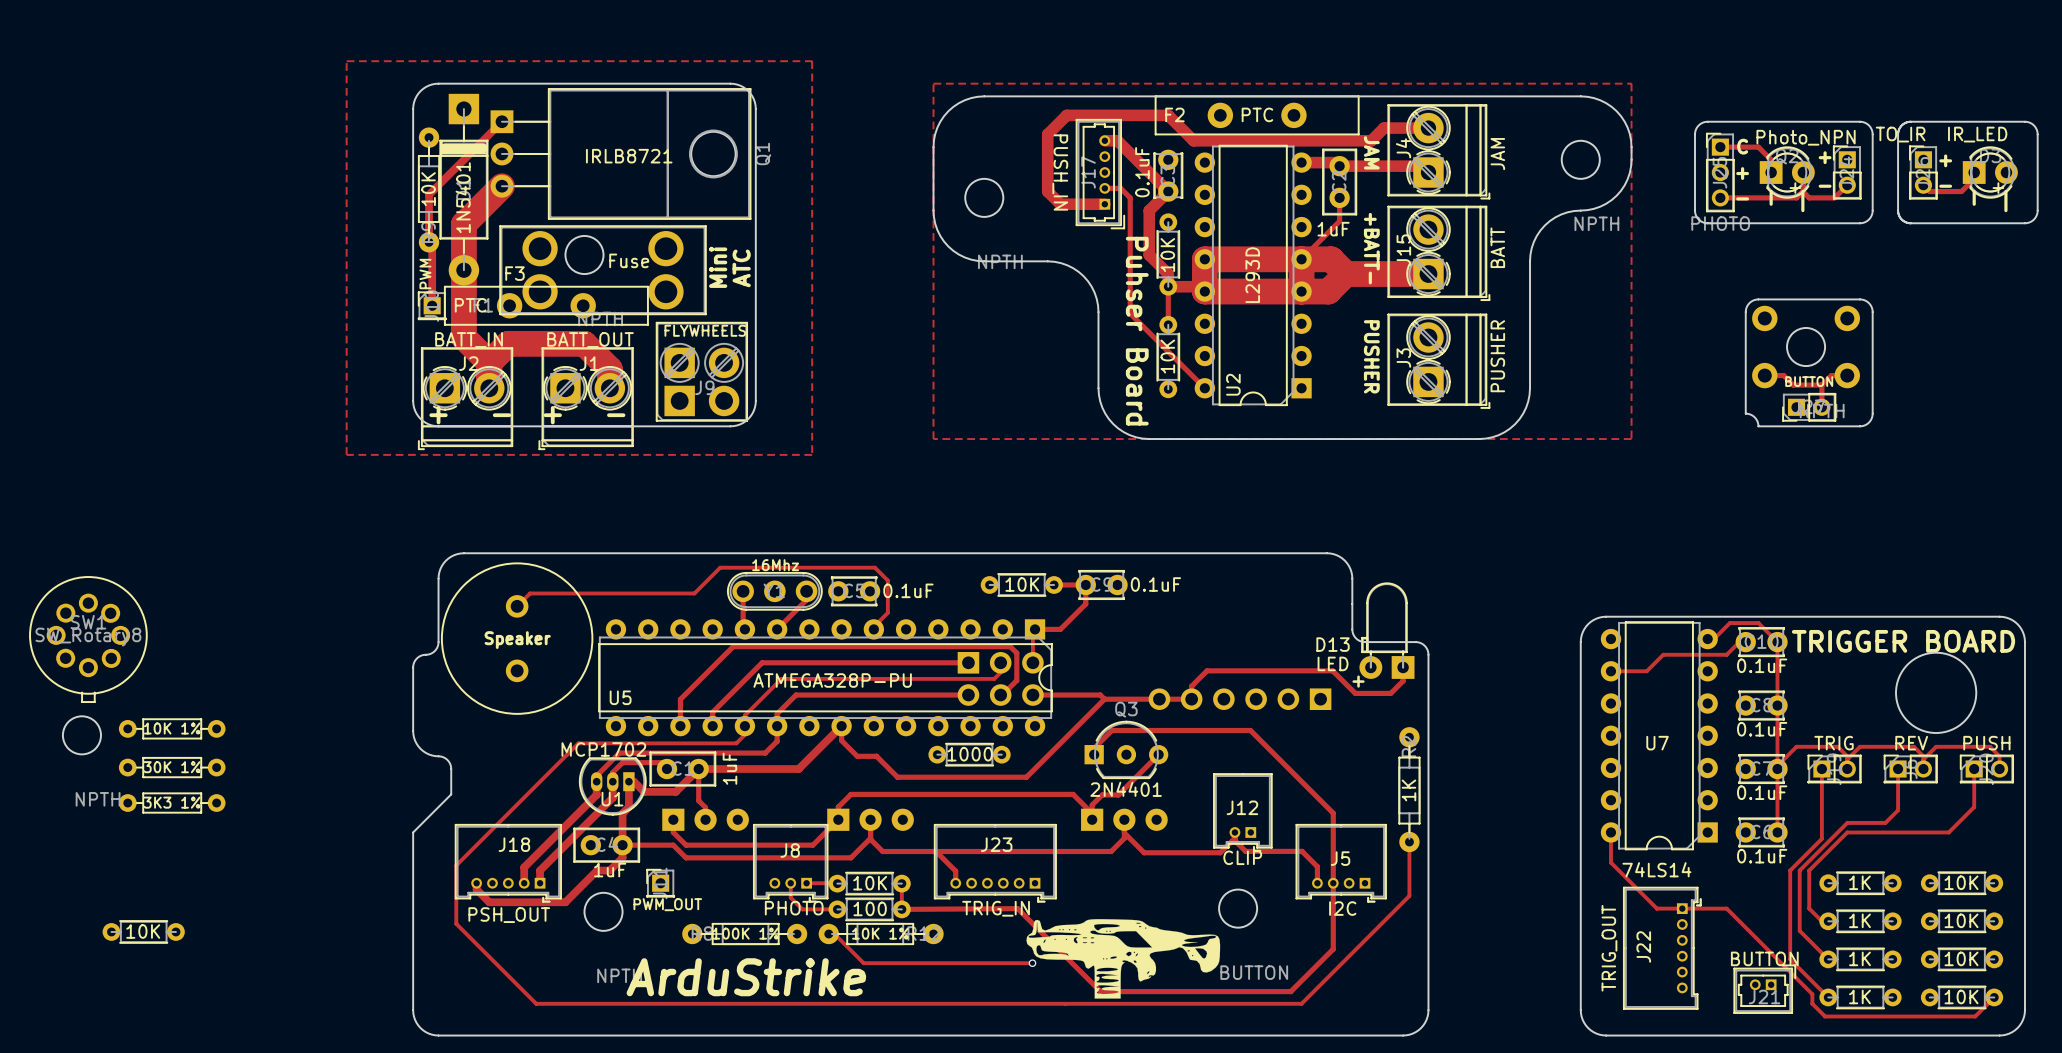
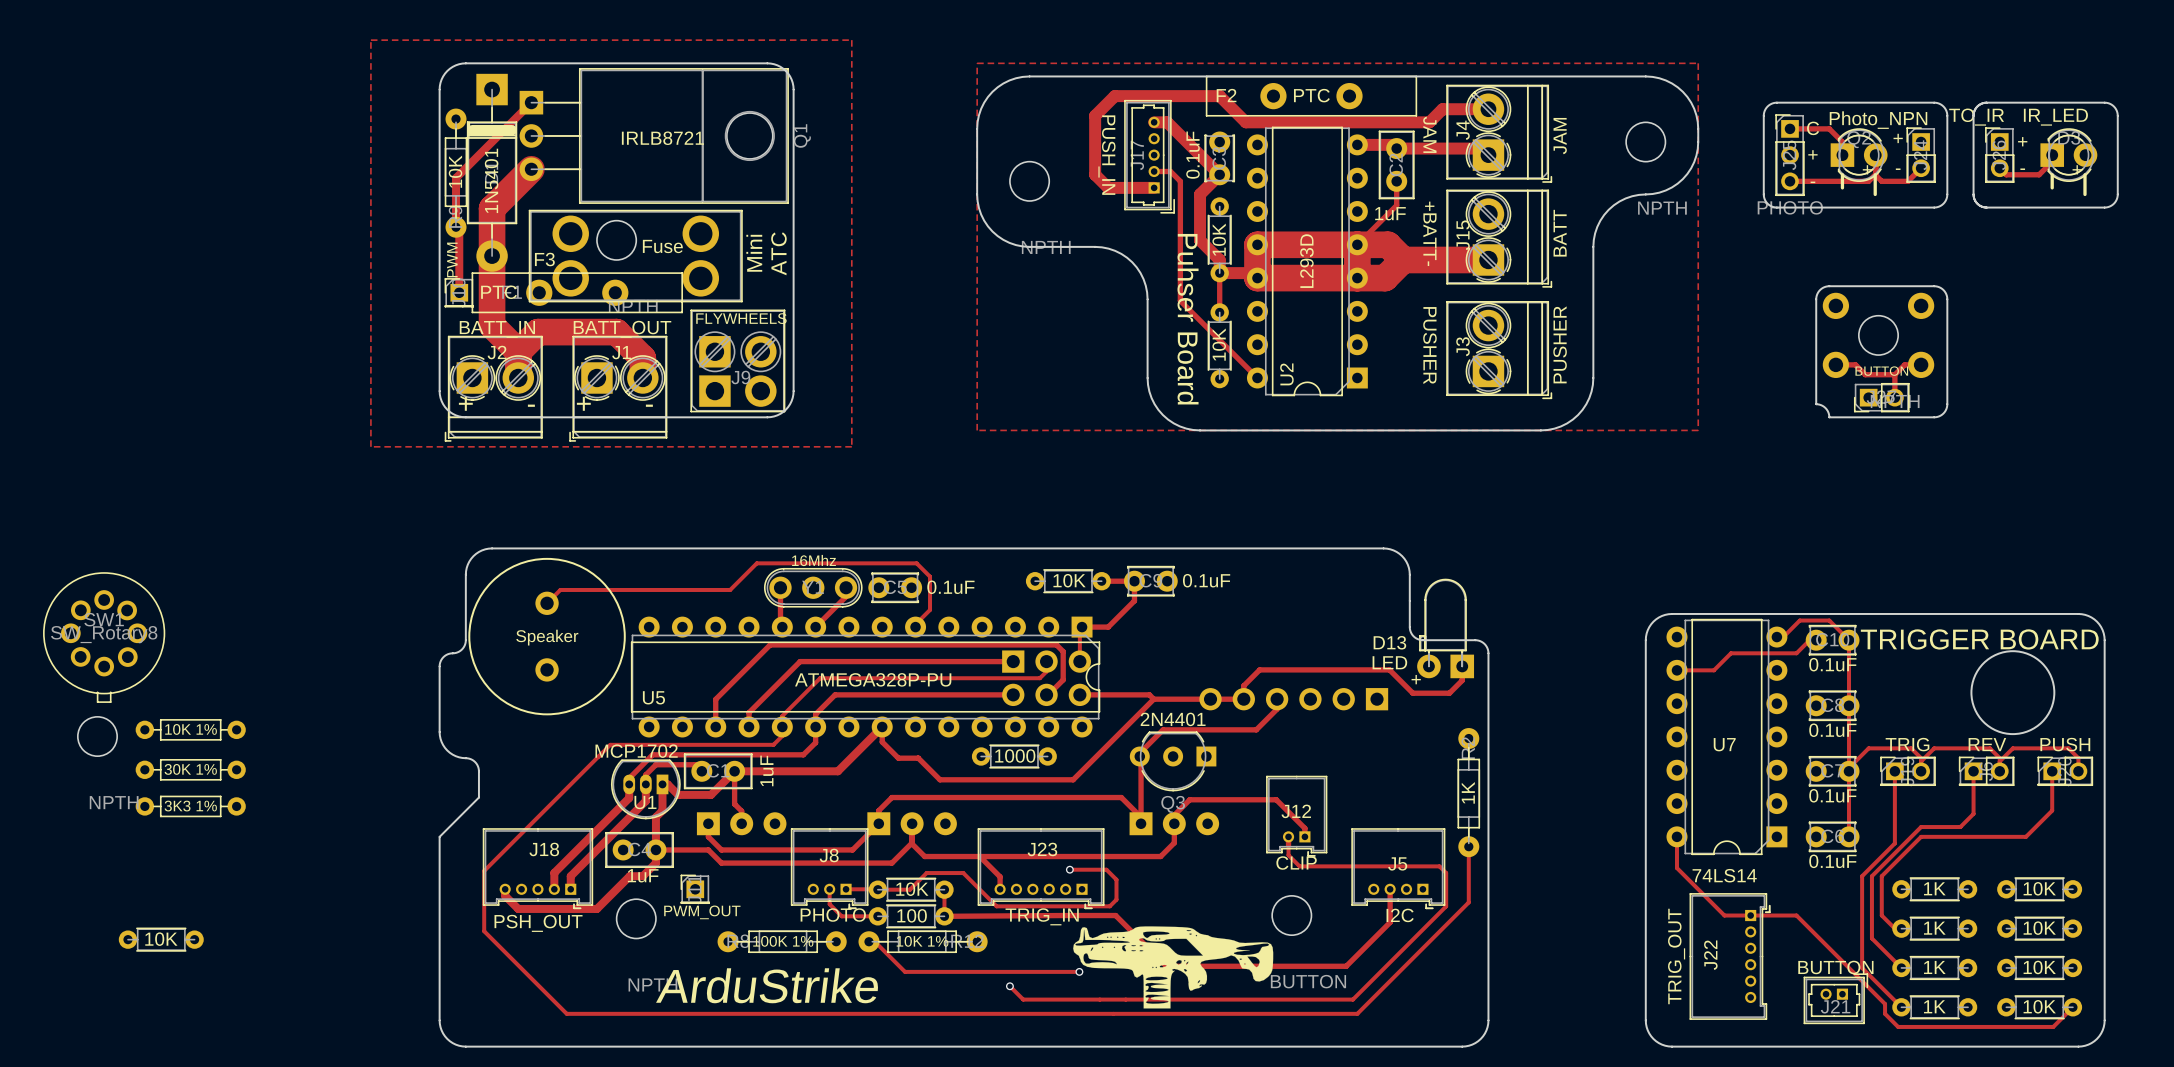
track: (1111, 730) (1250, 730) (1333, 813) (1333, 883) -> (1161, 731) (1163, 729) (1256, 729) (1277, 709) (1277, 699)
Q3 rotation: 0° (1126, 749) -> 180° (1173, 761)
track: (1158, 754) (1118, 794) (1102, 794) (1092, 805) -> (1143, 749) (1139, 753) (1141, 808)
track: none -> (1174, 823) (1174, 815) (1189, 799) (1276, 799) (1304, 828) (1304, 836)
track: (1124, 832) (1144, 852) (1220, 852) (1234, 838) -> none
track: (1234, 840) (1245, 851) (1302, 851) (1317, 866) (1317, 883) -> (1288, 845) (1288, 855) (1299, 866) (1439, 866) (1446, 873) (1446, 906) (1352, 999) (1023, 999) (1009, 986)
track: none -> (1069, 869) (1106, 869) (1116, 879) (1116, 899) (1109, 906) (996, 906) (963, 873) (926, 873) (910, 889) (877, 889)
via: none -> (1069, 869)
track: (1017, 908) (1100, 991) (1290, 991) (1333, 949) (1333, 915) -> (1063, 915) (1115, 915) (1166, 966) (1346, 966) (1390, 922)
via: none -> (1009, 986)

